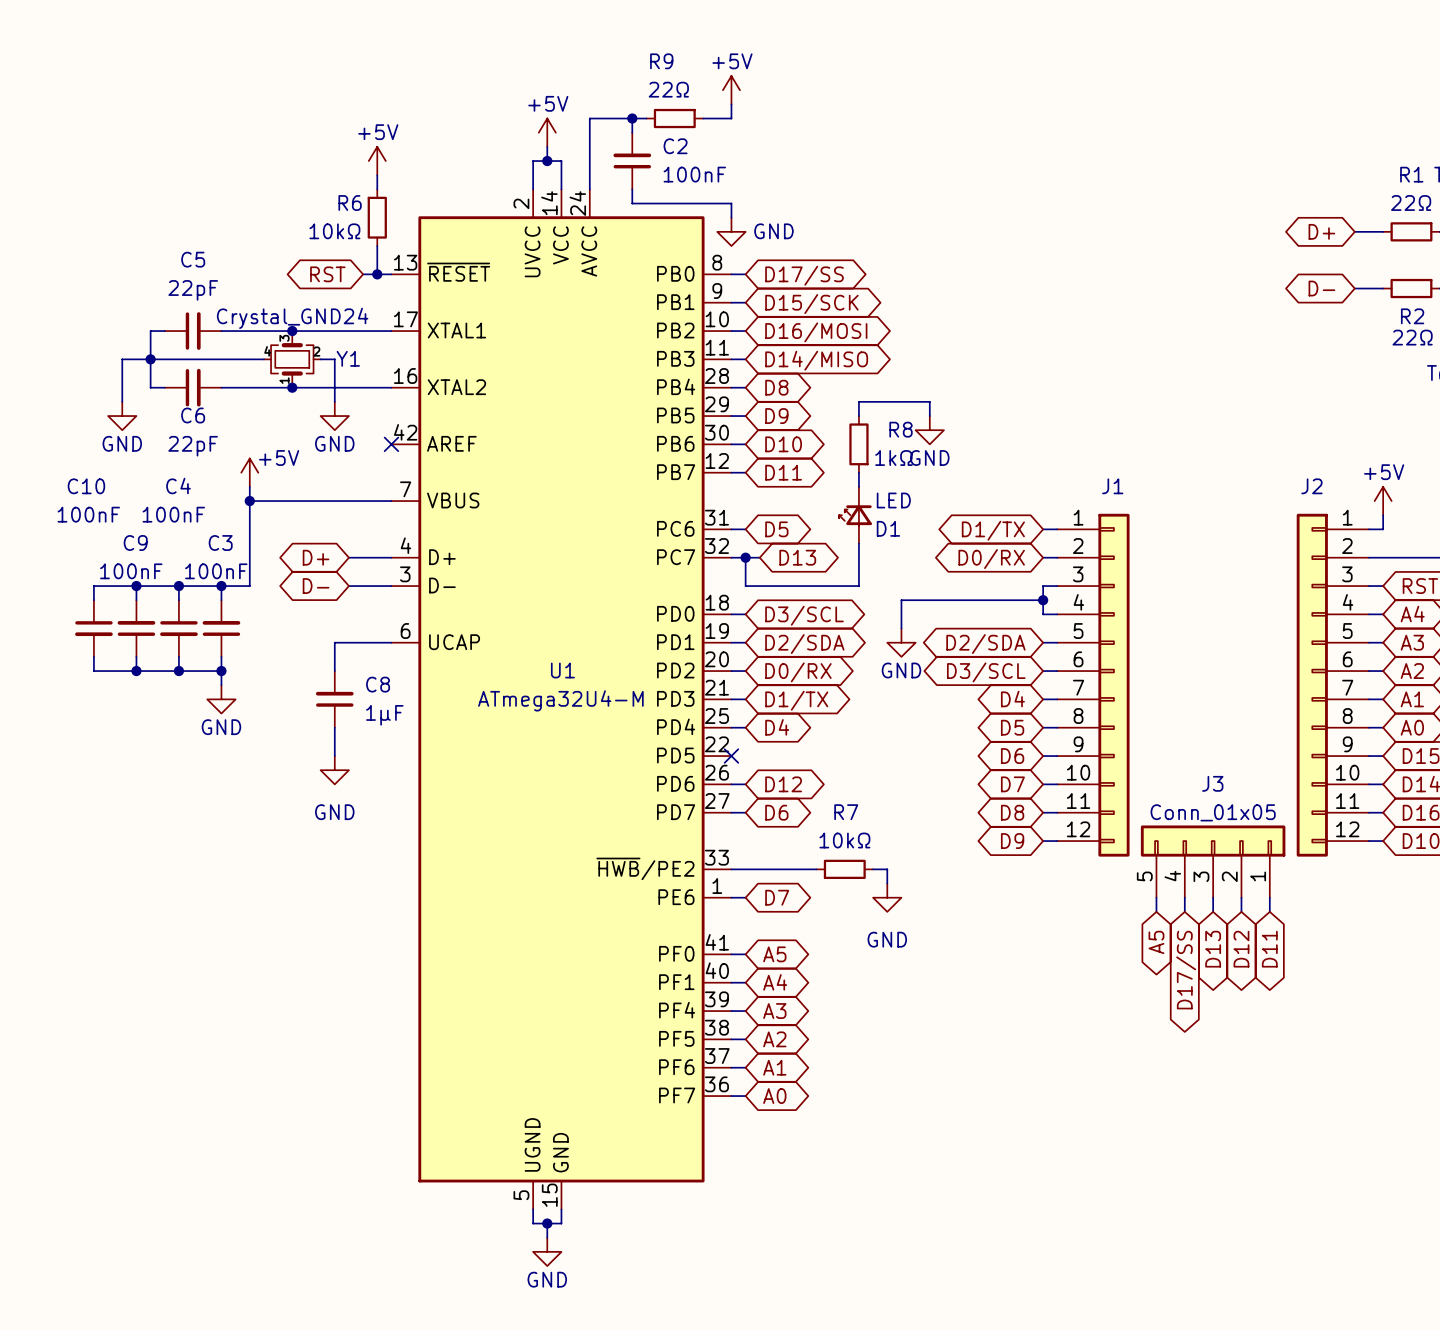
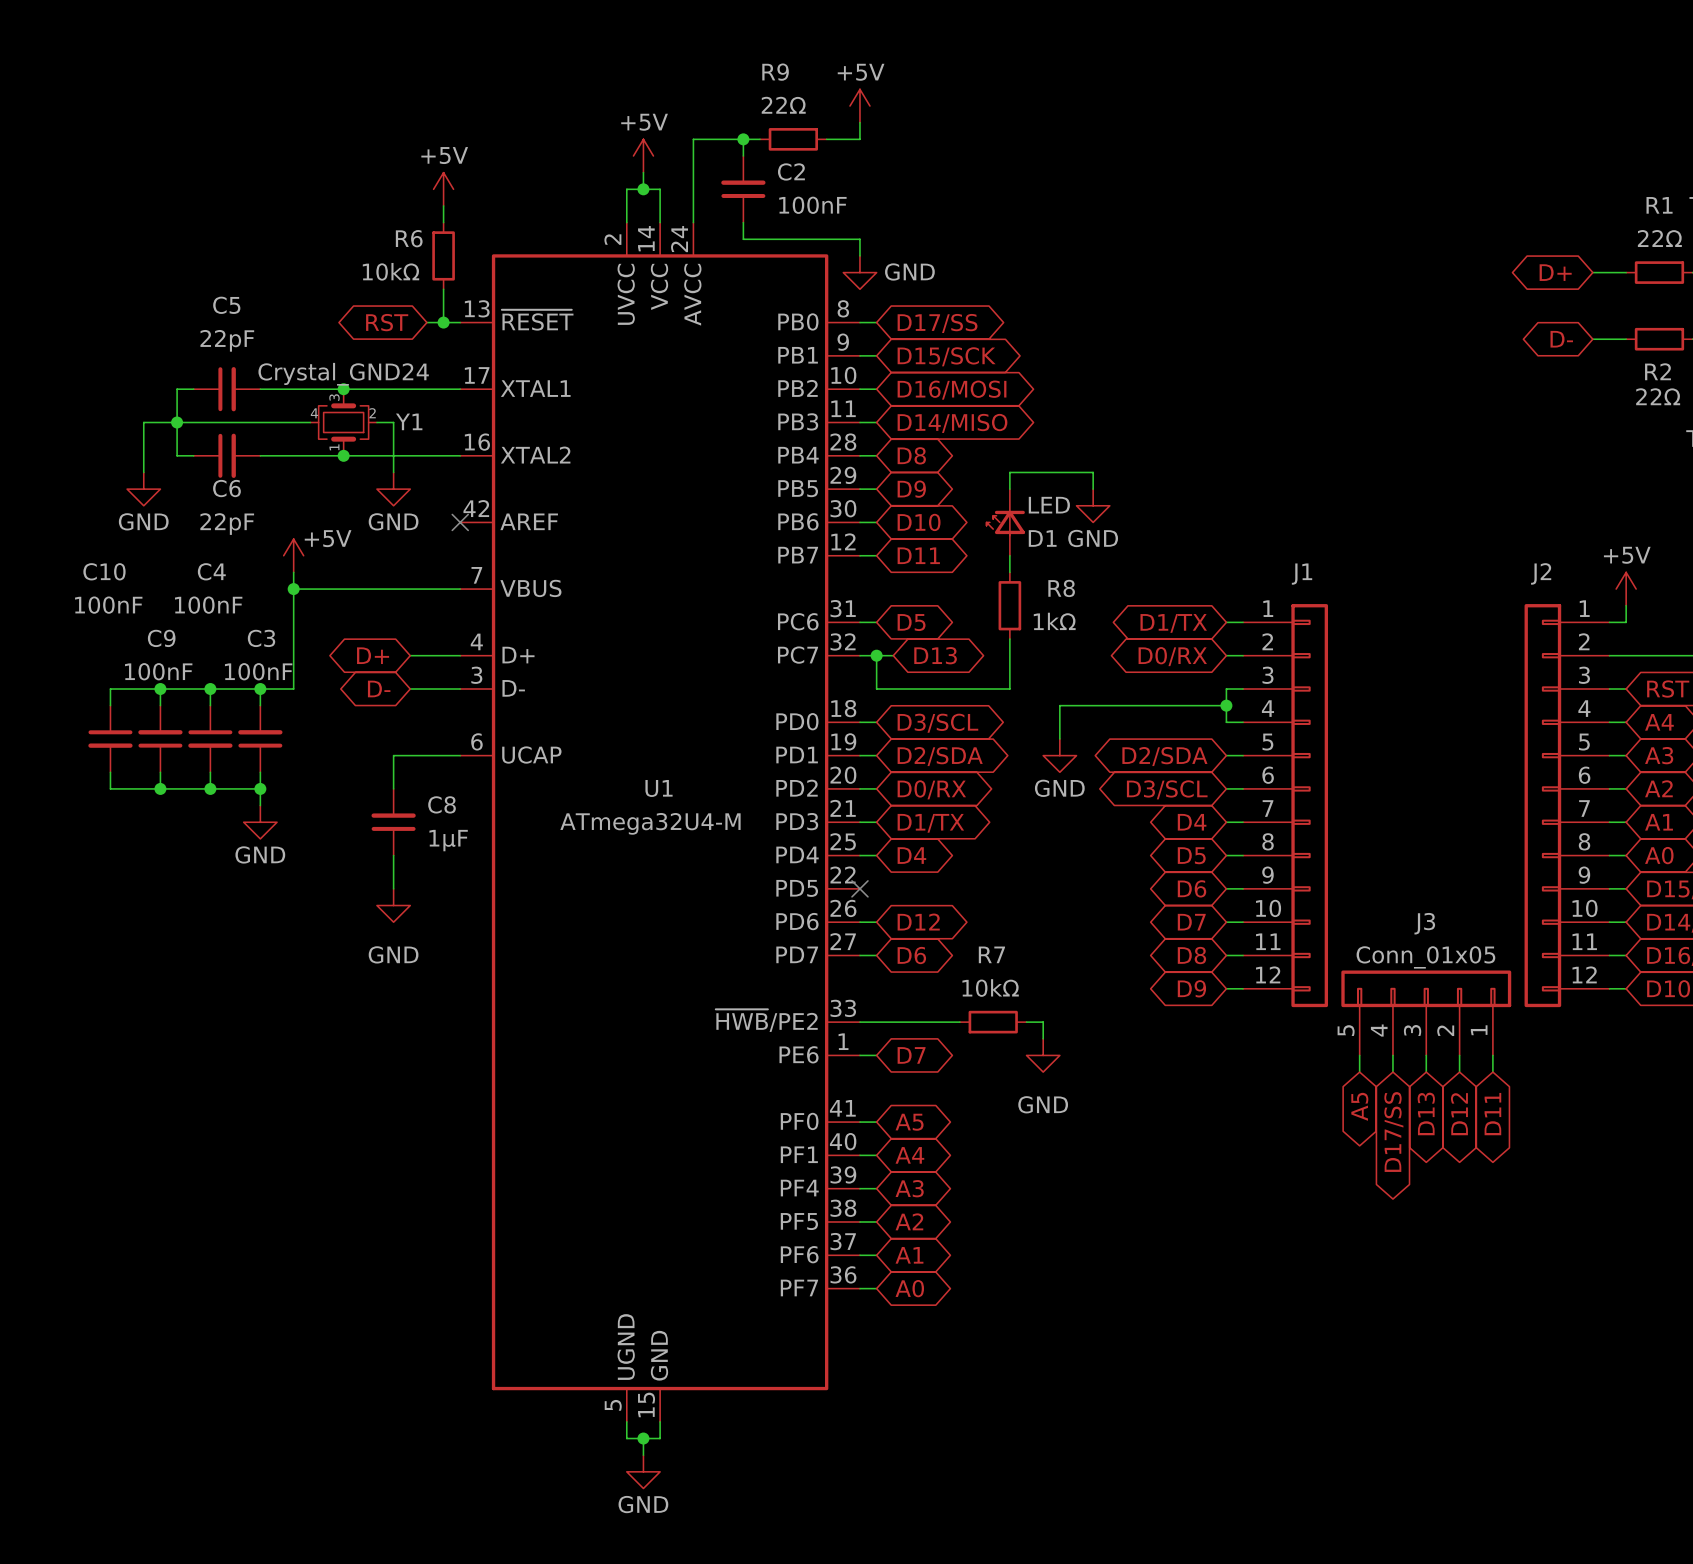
R8 position: (858, 444) -> (1009, 605)
D1 position: (855, 515) -> (1005, 522)

